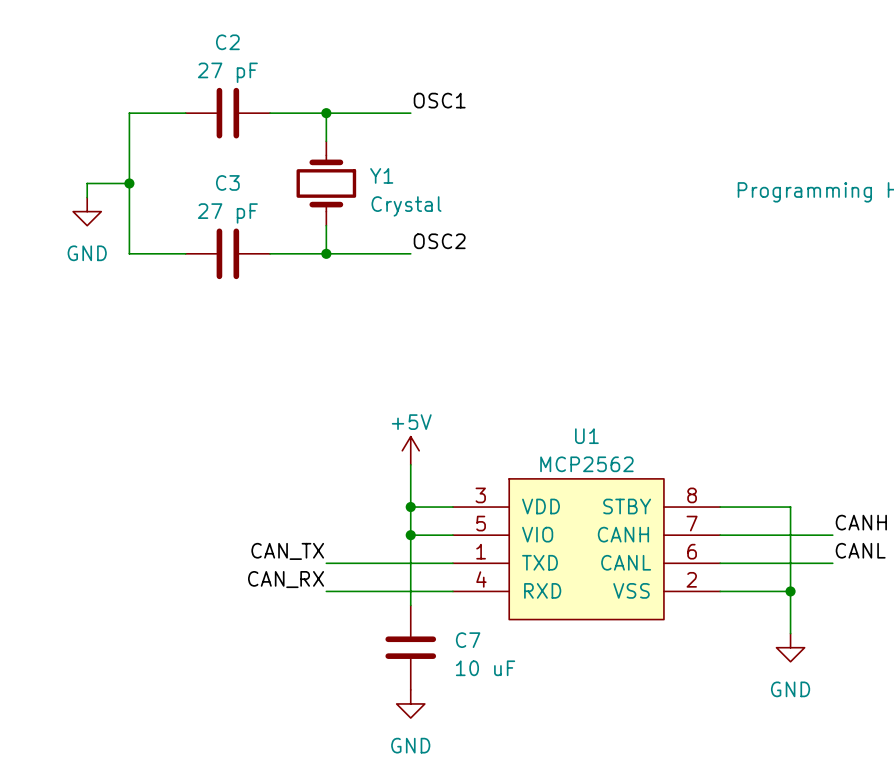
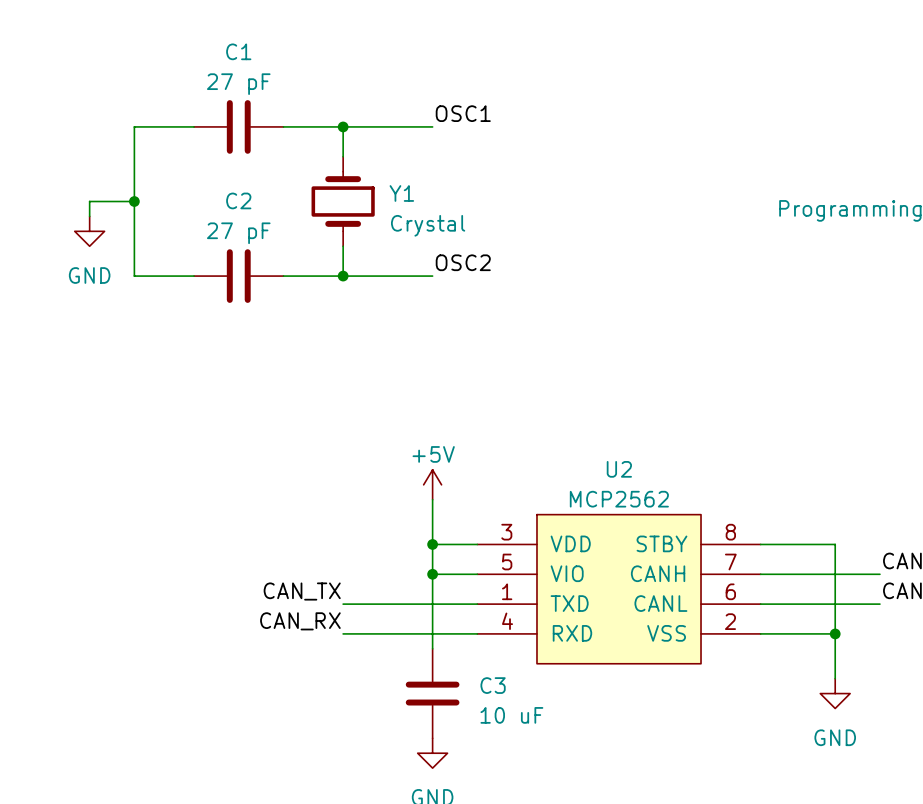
C2 name: C2 (227, 42) -> C1 (238, 51)
C3 name: C3 (227, 182) -> C2 (238, 200)
U1 name: U1 (586, 436) -> U2 (619, 469)
C7 name: C7 (468, 640) -> C3 (493, 685)

